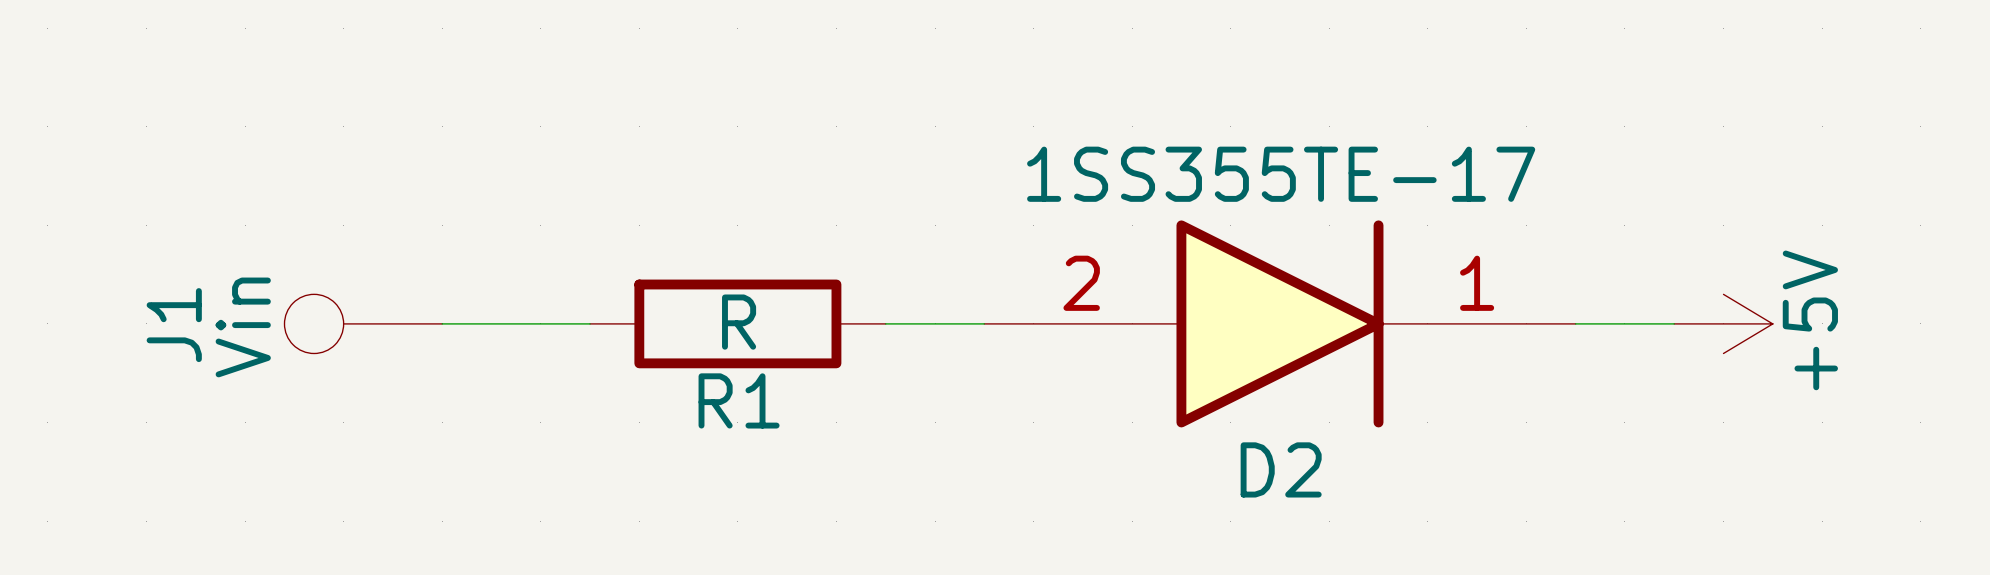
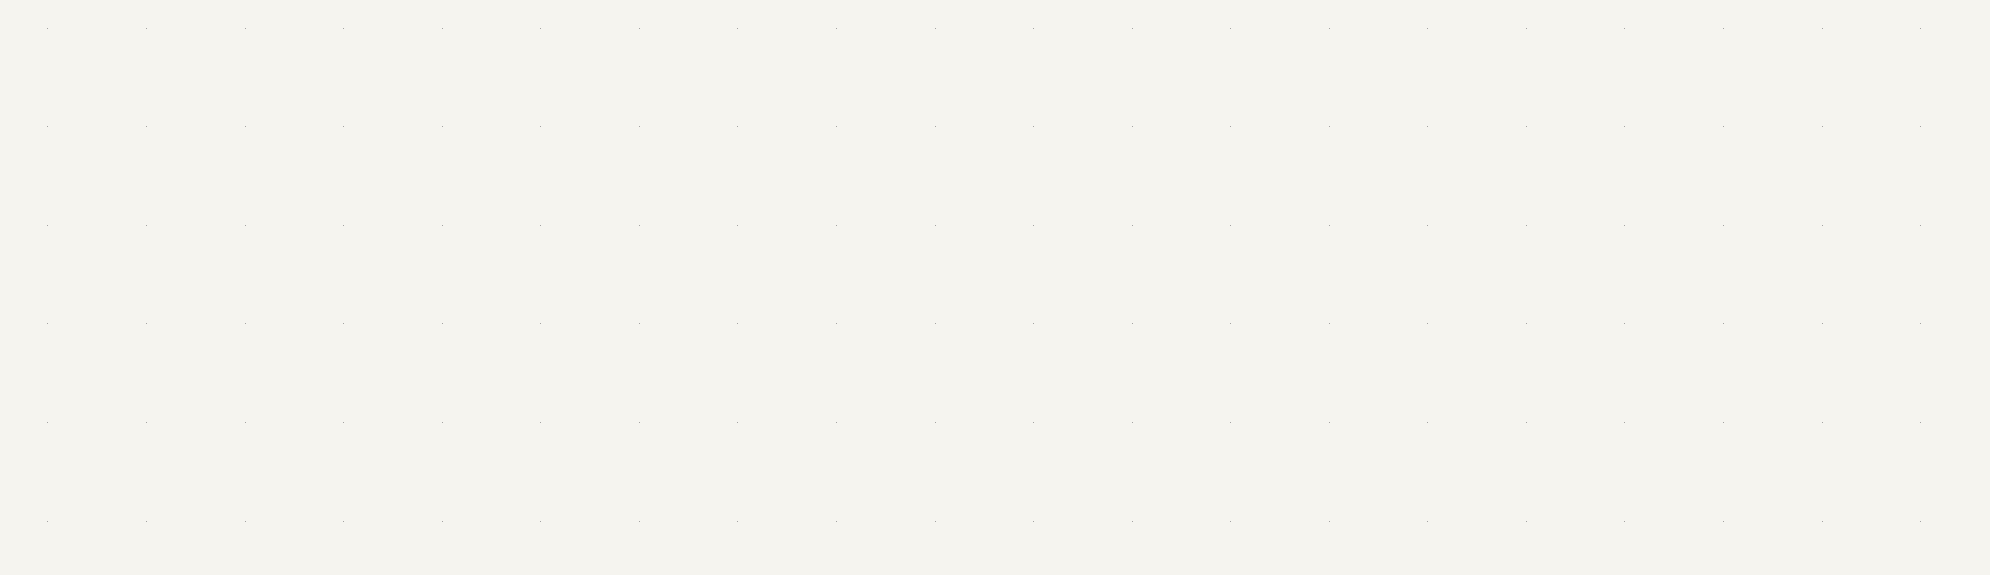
J1: Vin (363, 323) -> none
wire: (442, 323) (590, 323) -> none
R1: R (737, 323) -> none
wire: (885, 323) (984, 323) -> none
D2: 1SS355TE-17 (1279, 323) -> none
wire: (1575, 323) (1674, 323) -> none
power symbol: +5V (1723, 323) -> none

